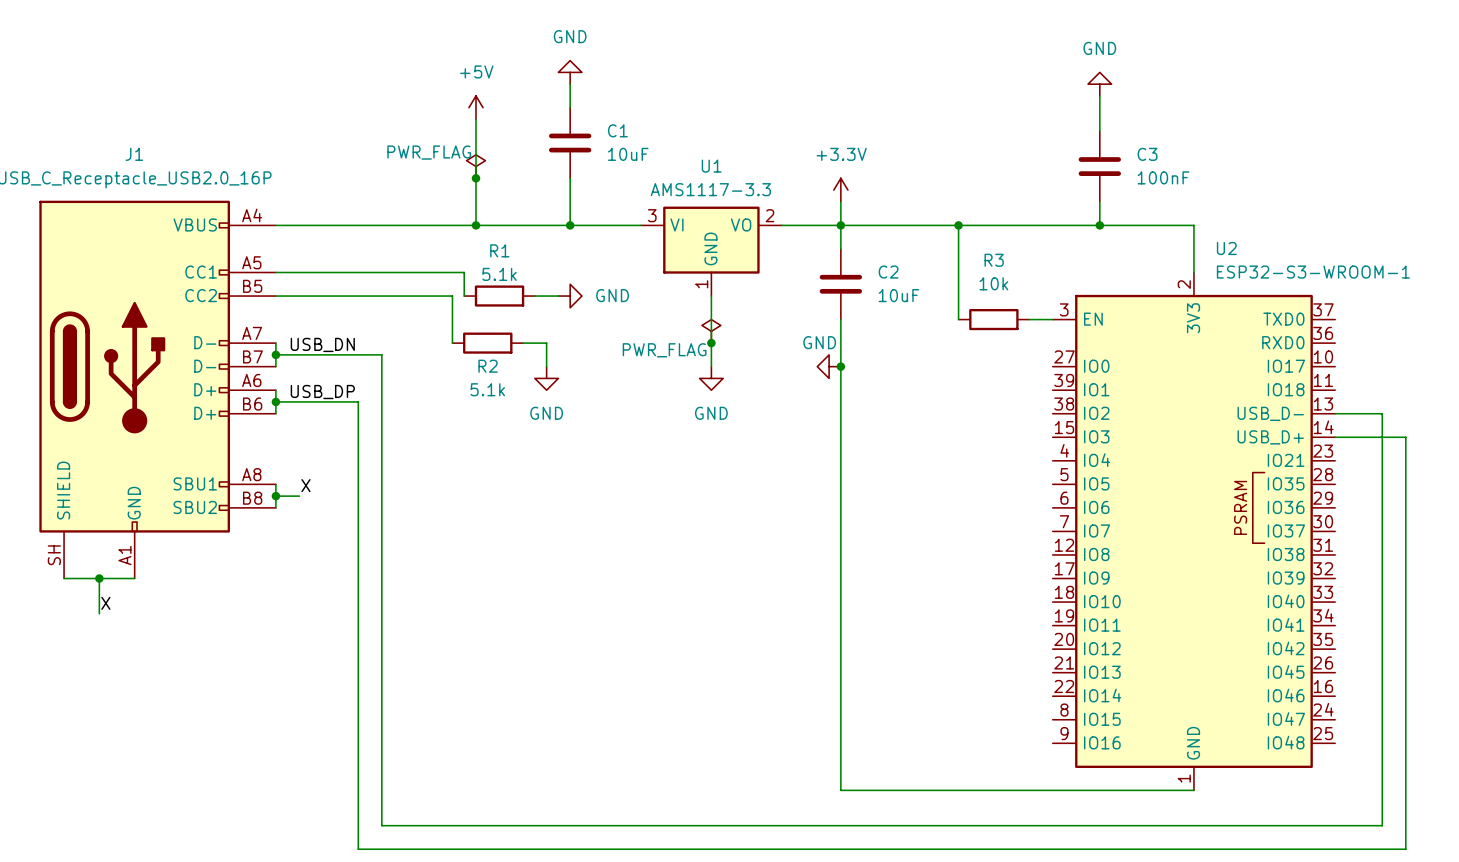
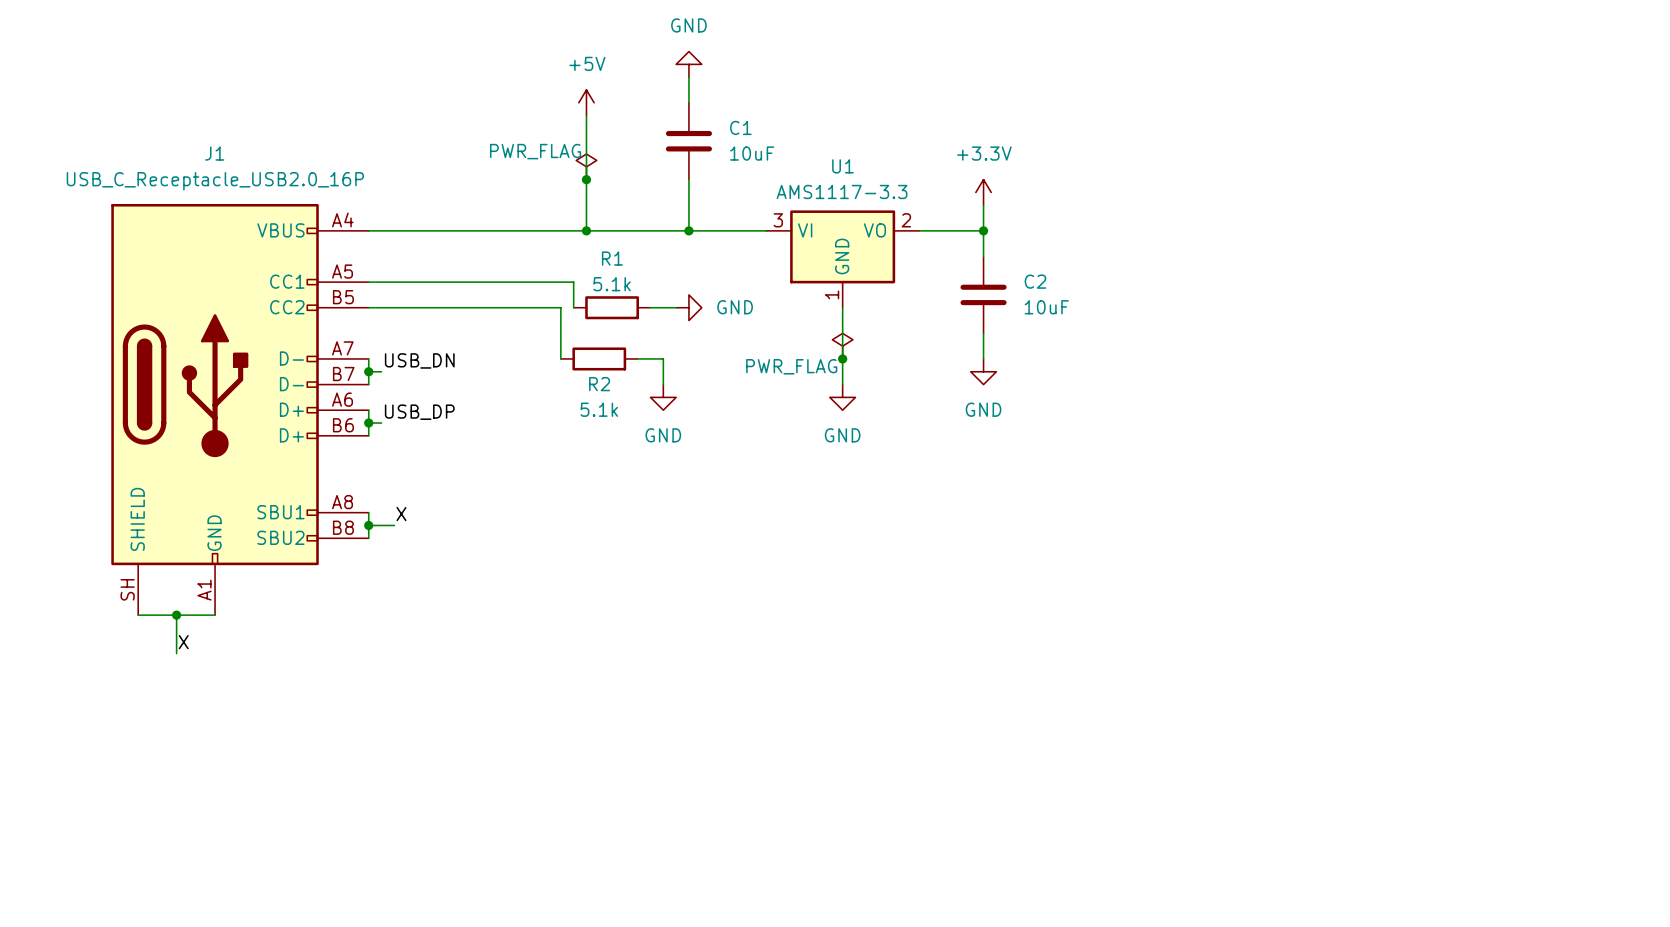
power symbol: GND (1099, 84) -> none
wire: (1099, 95) (1099, 131) -> none
C3: 100nF (1099, 166) -> none
wire: (1099, 201) (1099, 225) -> none
wire: (840, 225) (1193, 225) (1193, 272) -> none
wire: (958, 225) (958, 319) -> none
junction: (958, 225) -> none
junction: (1099, 225) -> none
R3: 10k (993, 319) -> none
wire: (1029, 319) (1052, 319) -> none
power symbol text position: GND (819, 342) -> GND (983, 409)
wire: (840, 343) (840, 790) (1193, 790) -> none
wire: (287, 354) (381, 354) (381, 825) (1382, 825) (1382, 413) (1335, 413) -> none
power symbol rotation: 0° (829, 366) -> 90° counterclockwise (983, 371)
power symbol position: GND (829, 366) -> GND (983, 371)
junction: (840, 366) -> none
wire: (287, 401) (358, 401) (358, 849) (1405, 849) (1405, 437) (1335, 437) -> none
U2: ESP32-S3-WROOM-1 (1193, 531) -> none

